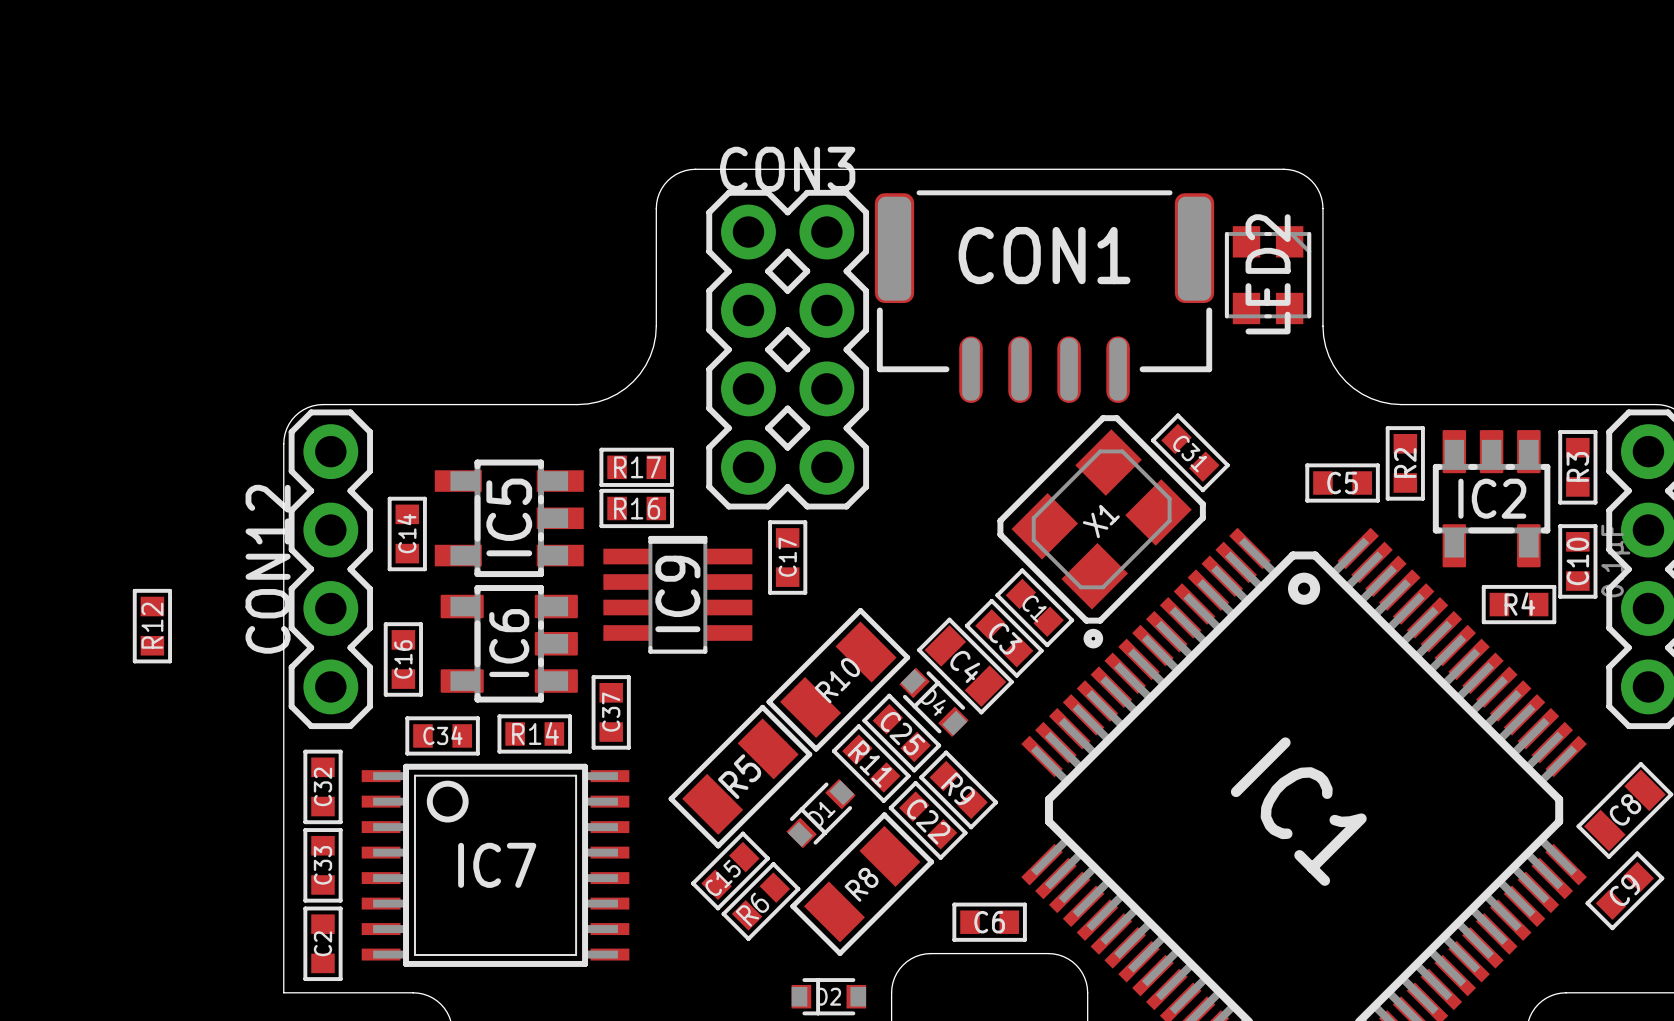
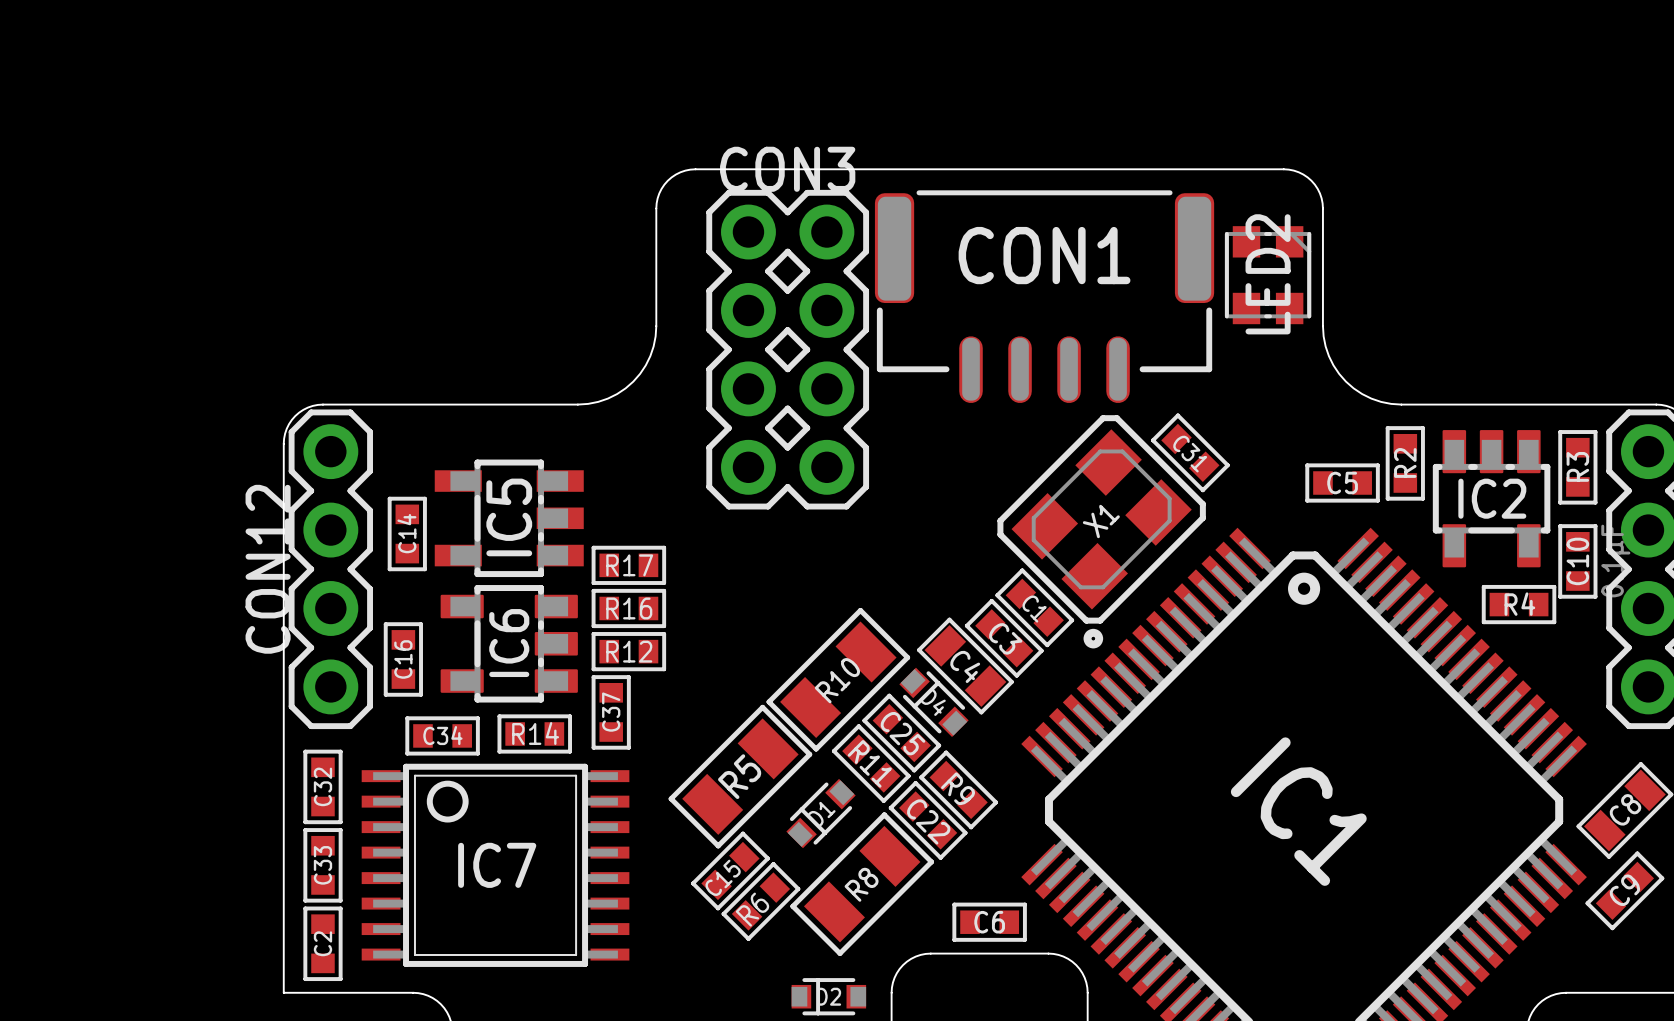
R17 position: (636, 467) -> (628, 565)
R16 position: (636, 508) -> (628, 608)
C17: (787, 557) -> none
IC9: (677, 594) -> none
R12 rotation: 0° (152, 626) -> 90° clockwise (628, 651)
R12 position: (152, 626) -> (628, 651)

